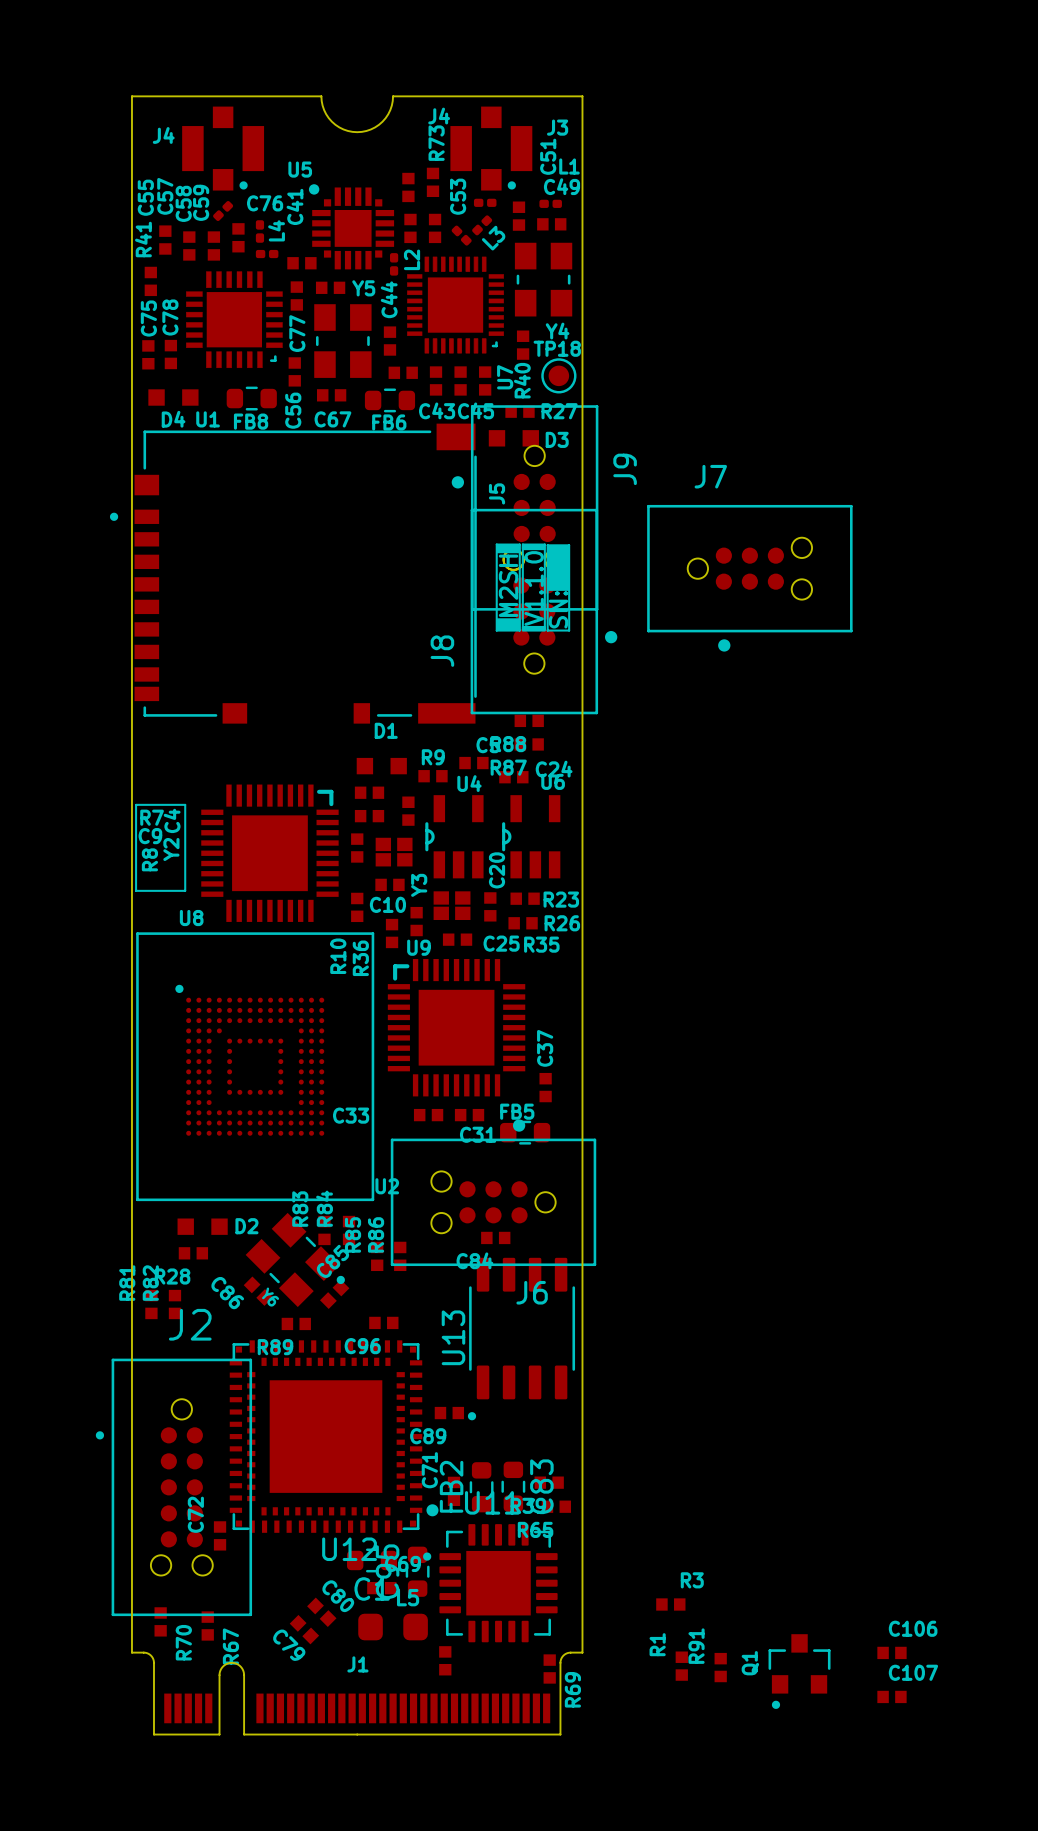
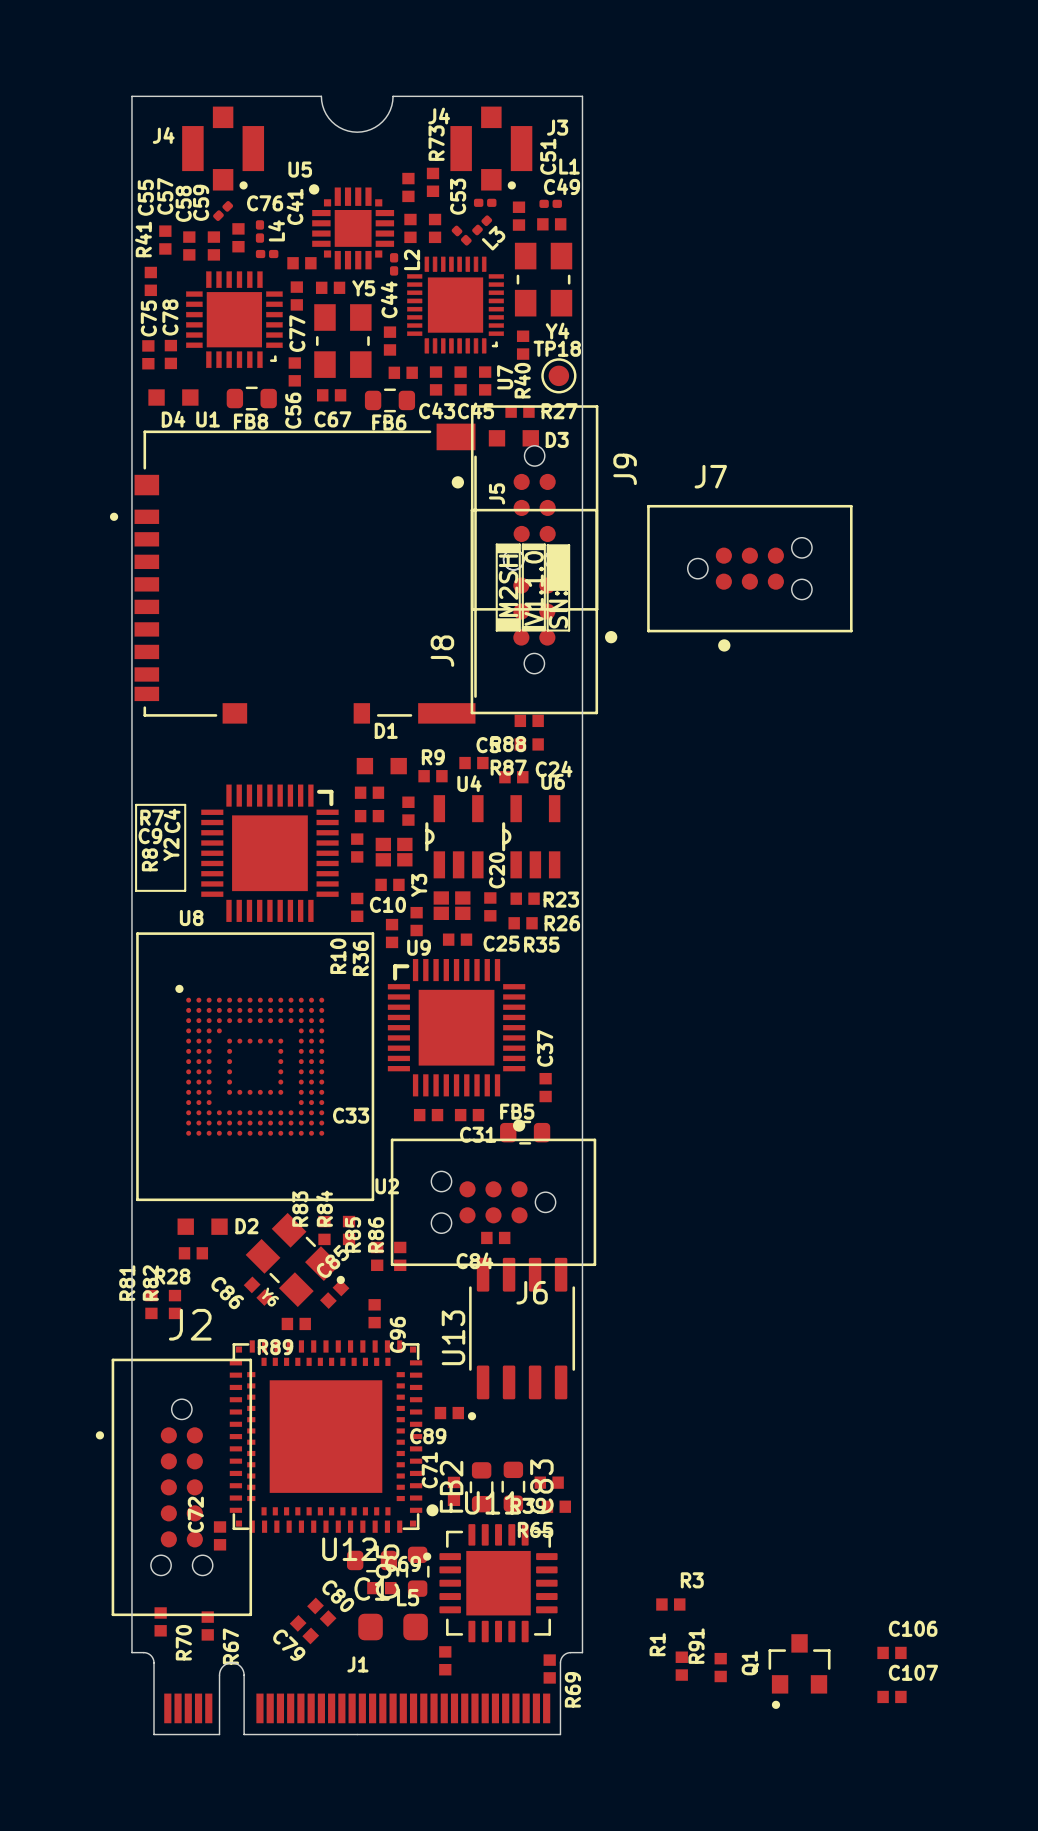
C96 rotation: 0° (383, 1322) -> 90° clockwise (374, 1313)
C96 name position: C96 (362, 1346) -> C96 (397, 1334)

